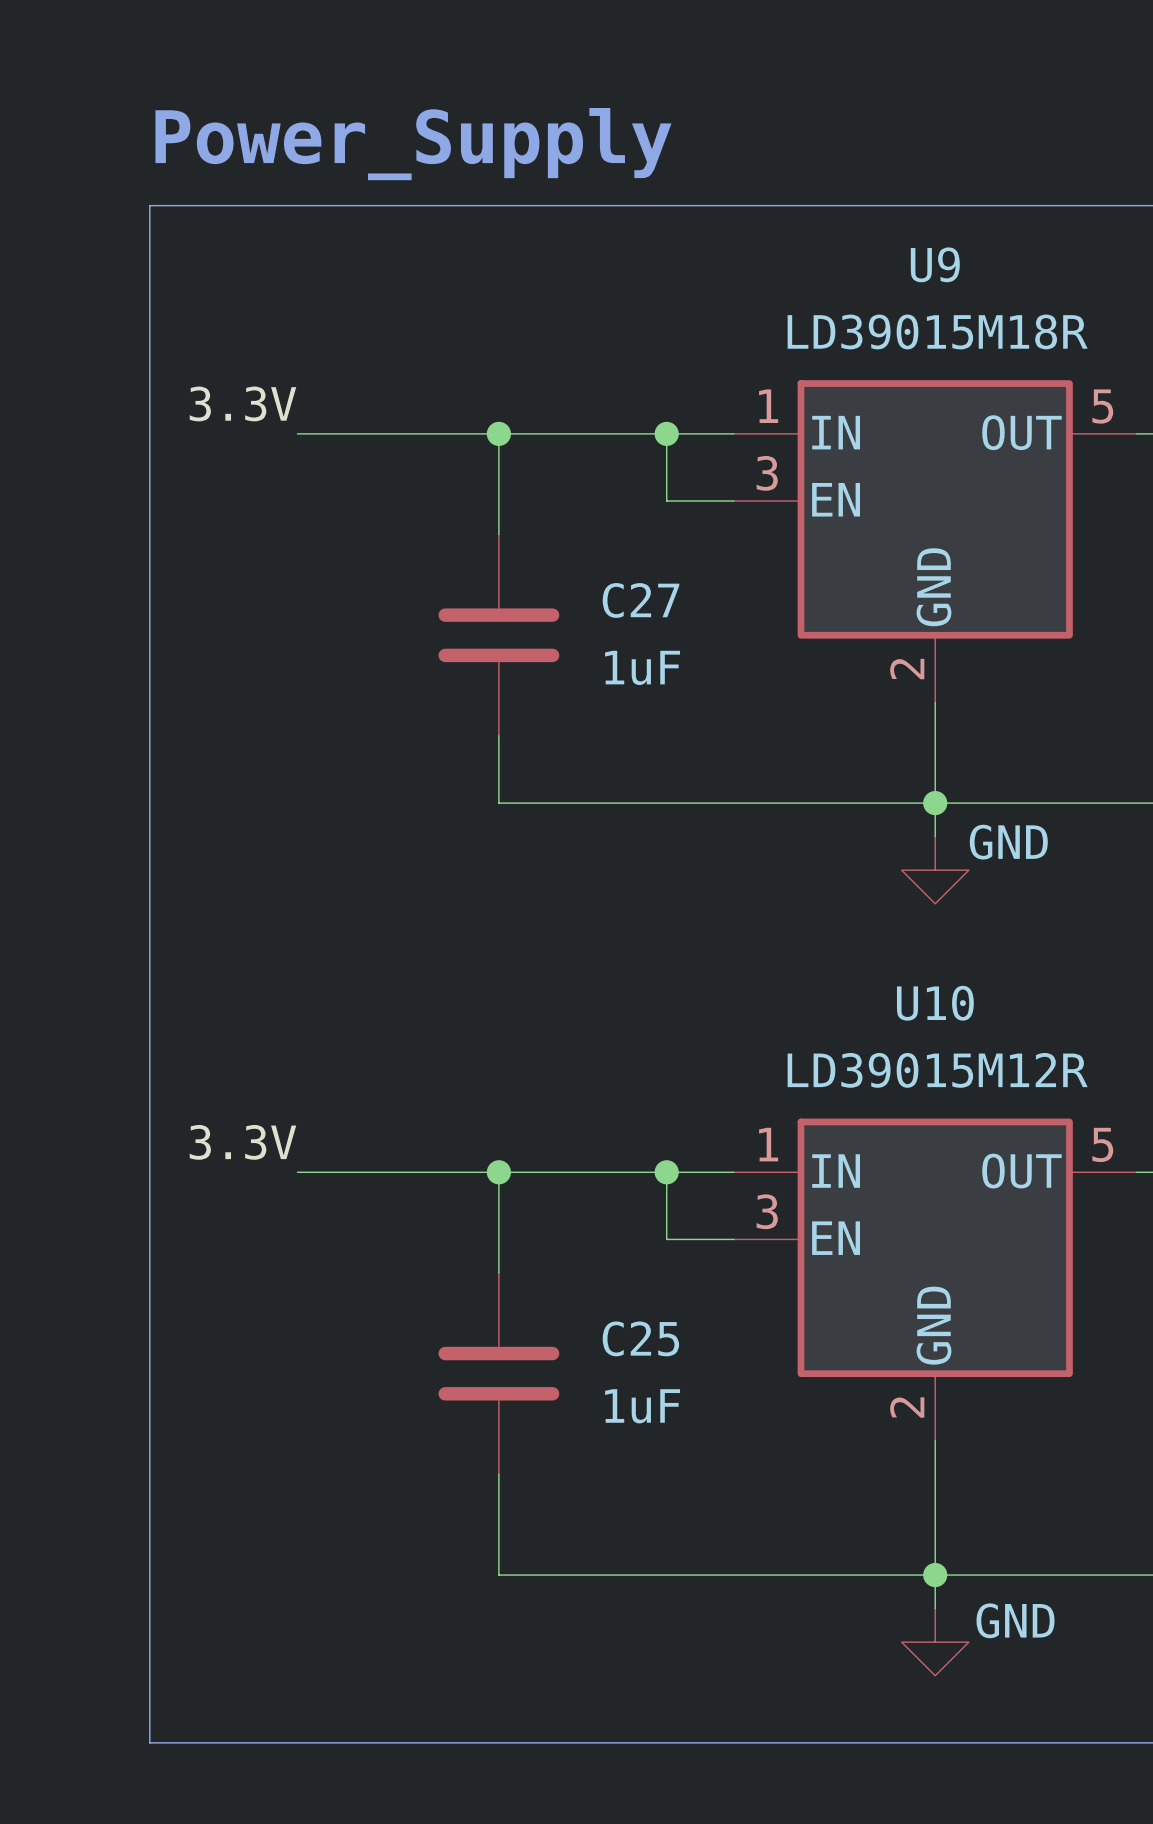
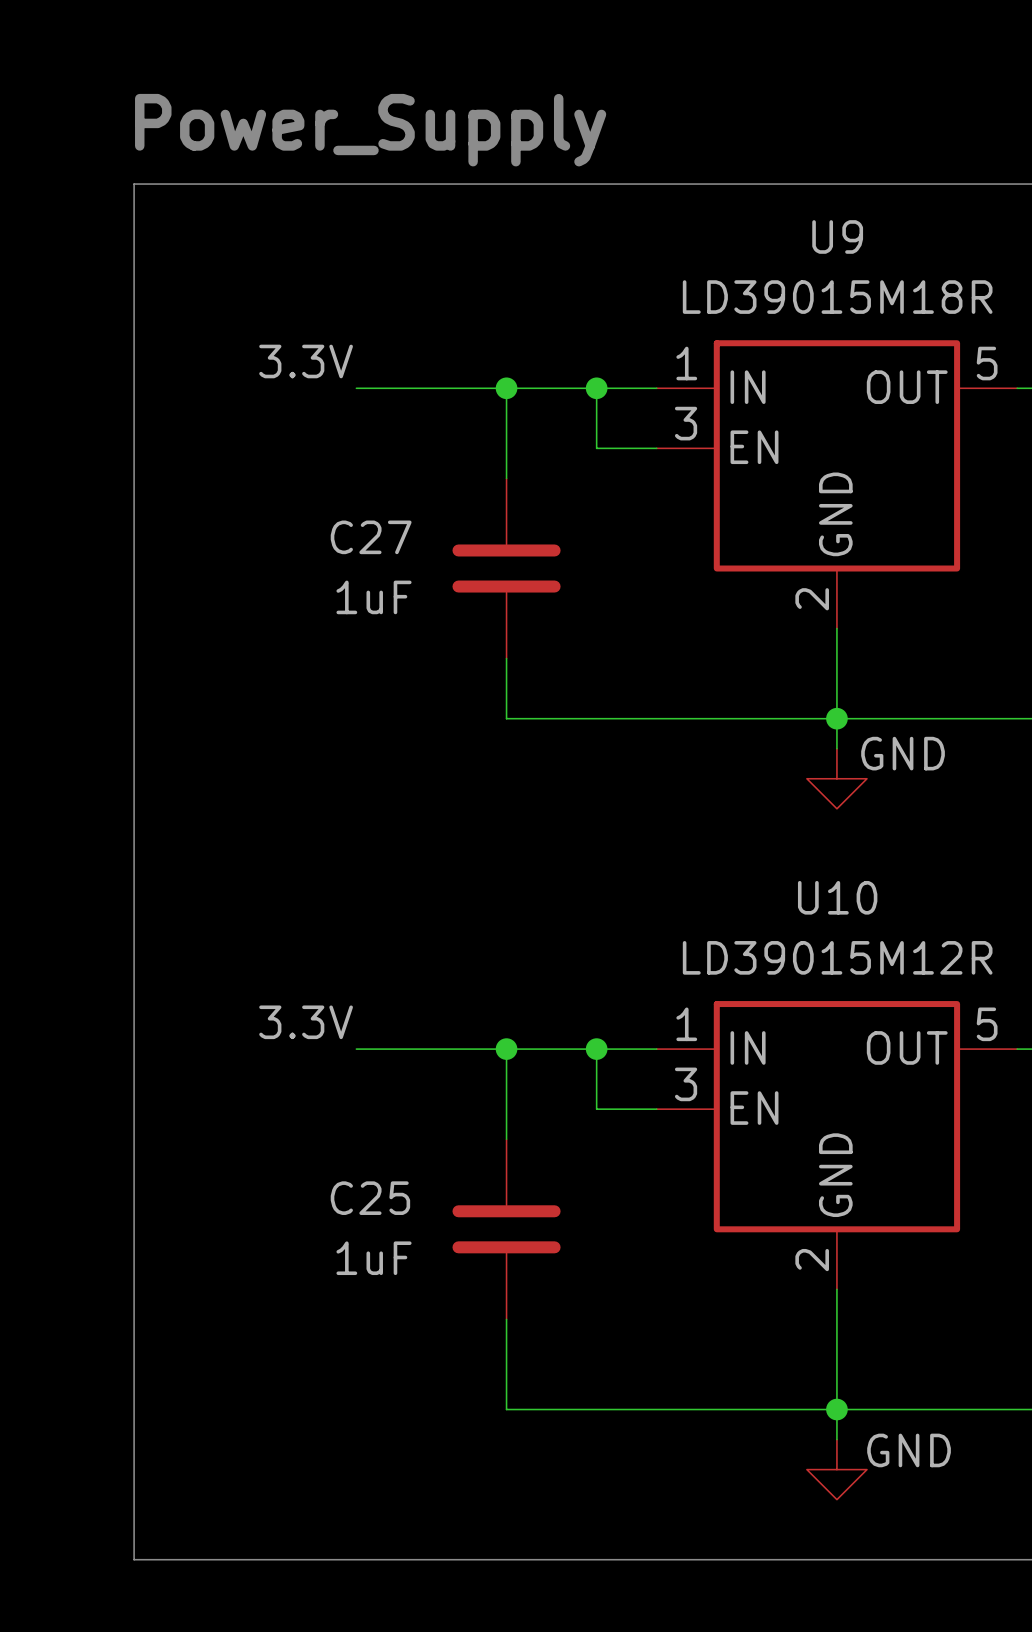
label position: 3.3V (242, 403) -> 3.3V (306, 361)
wire: (297, 433) (398, 433) -> none
wire: (498, 433) (498, 534) -> (506, 388) (506, 478)
junction position: (498, 433) -> (506, 388)
C27 name position: C27 (640, 600) -> C27 (371, 537)
C27 position: (498, 635) -> (506, 568)
C27 value position: 1uF (642, 667) -> 1uF (374, 597)
wire: (498, 735) (498, 803) (566, 803) -> (506, 658) (506, 718)
label position: 3.3V (242, 1142) -> 3.3V (306, 1022)
wire: (297, 1172) (398, 1172) -> none
wire: (498, 1172) (498, 1272) -> (506, 1049) (506, 1139)
junction position: (498, 1172) -> (506, 1049)
C25 name position: C25 (640, 1338) -> C25 (370, 1198)
C25 position: (498, 1373) -> (506, 1229)
C25 value position: 1uF (642, 1406) -> 1uF (374, 1258)
wire: (498, 1474) (498, 1575) (566, 1575) -> (506, 1319) (506, 1409)

